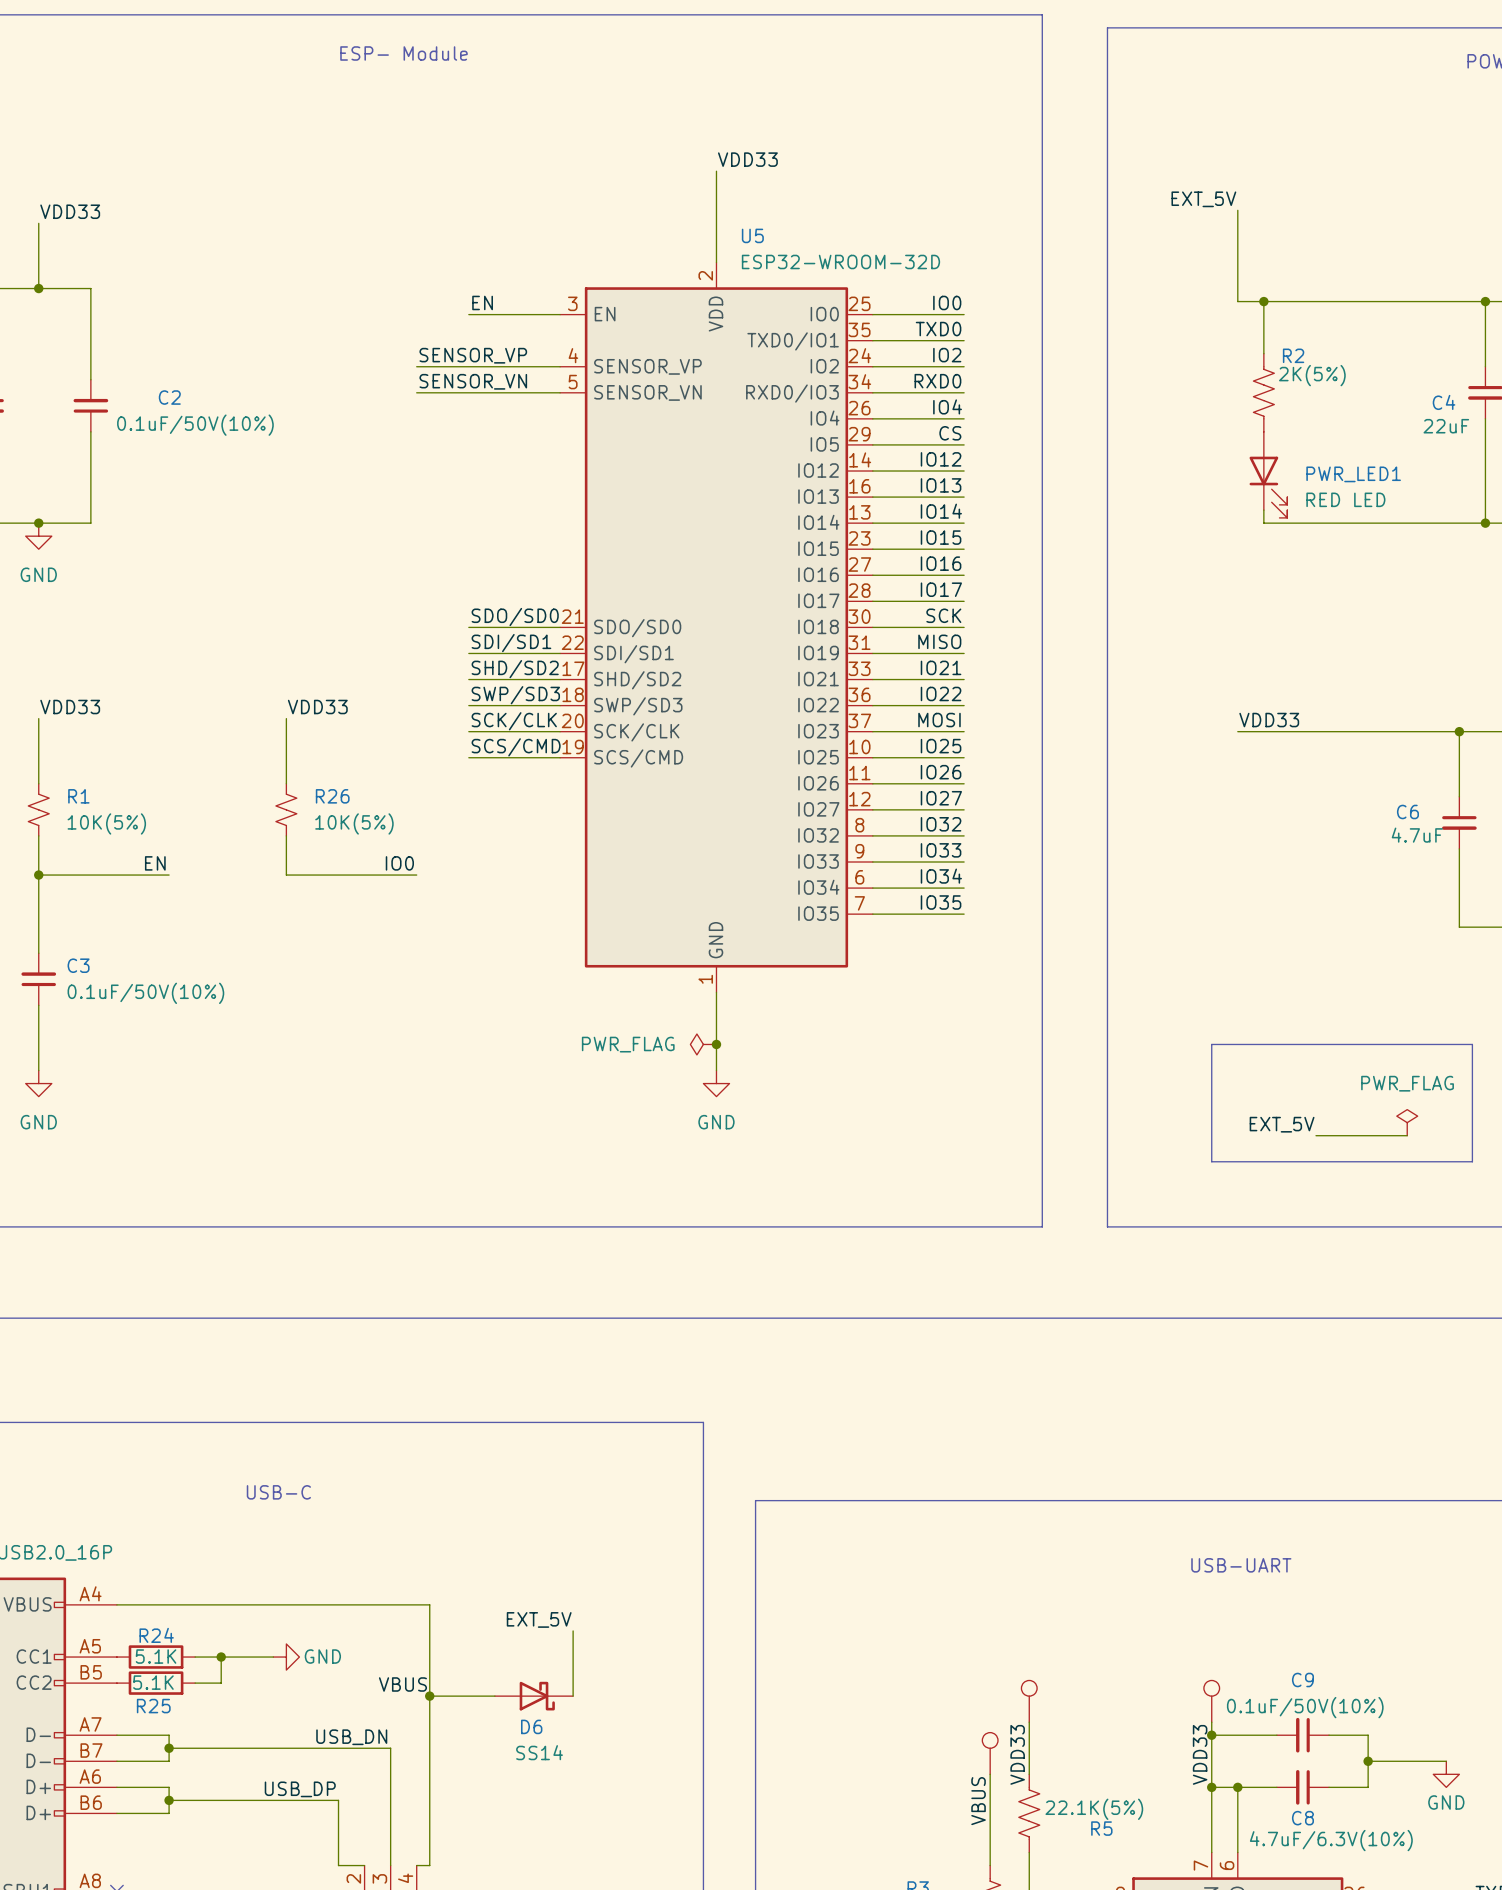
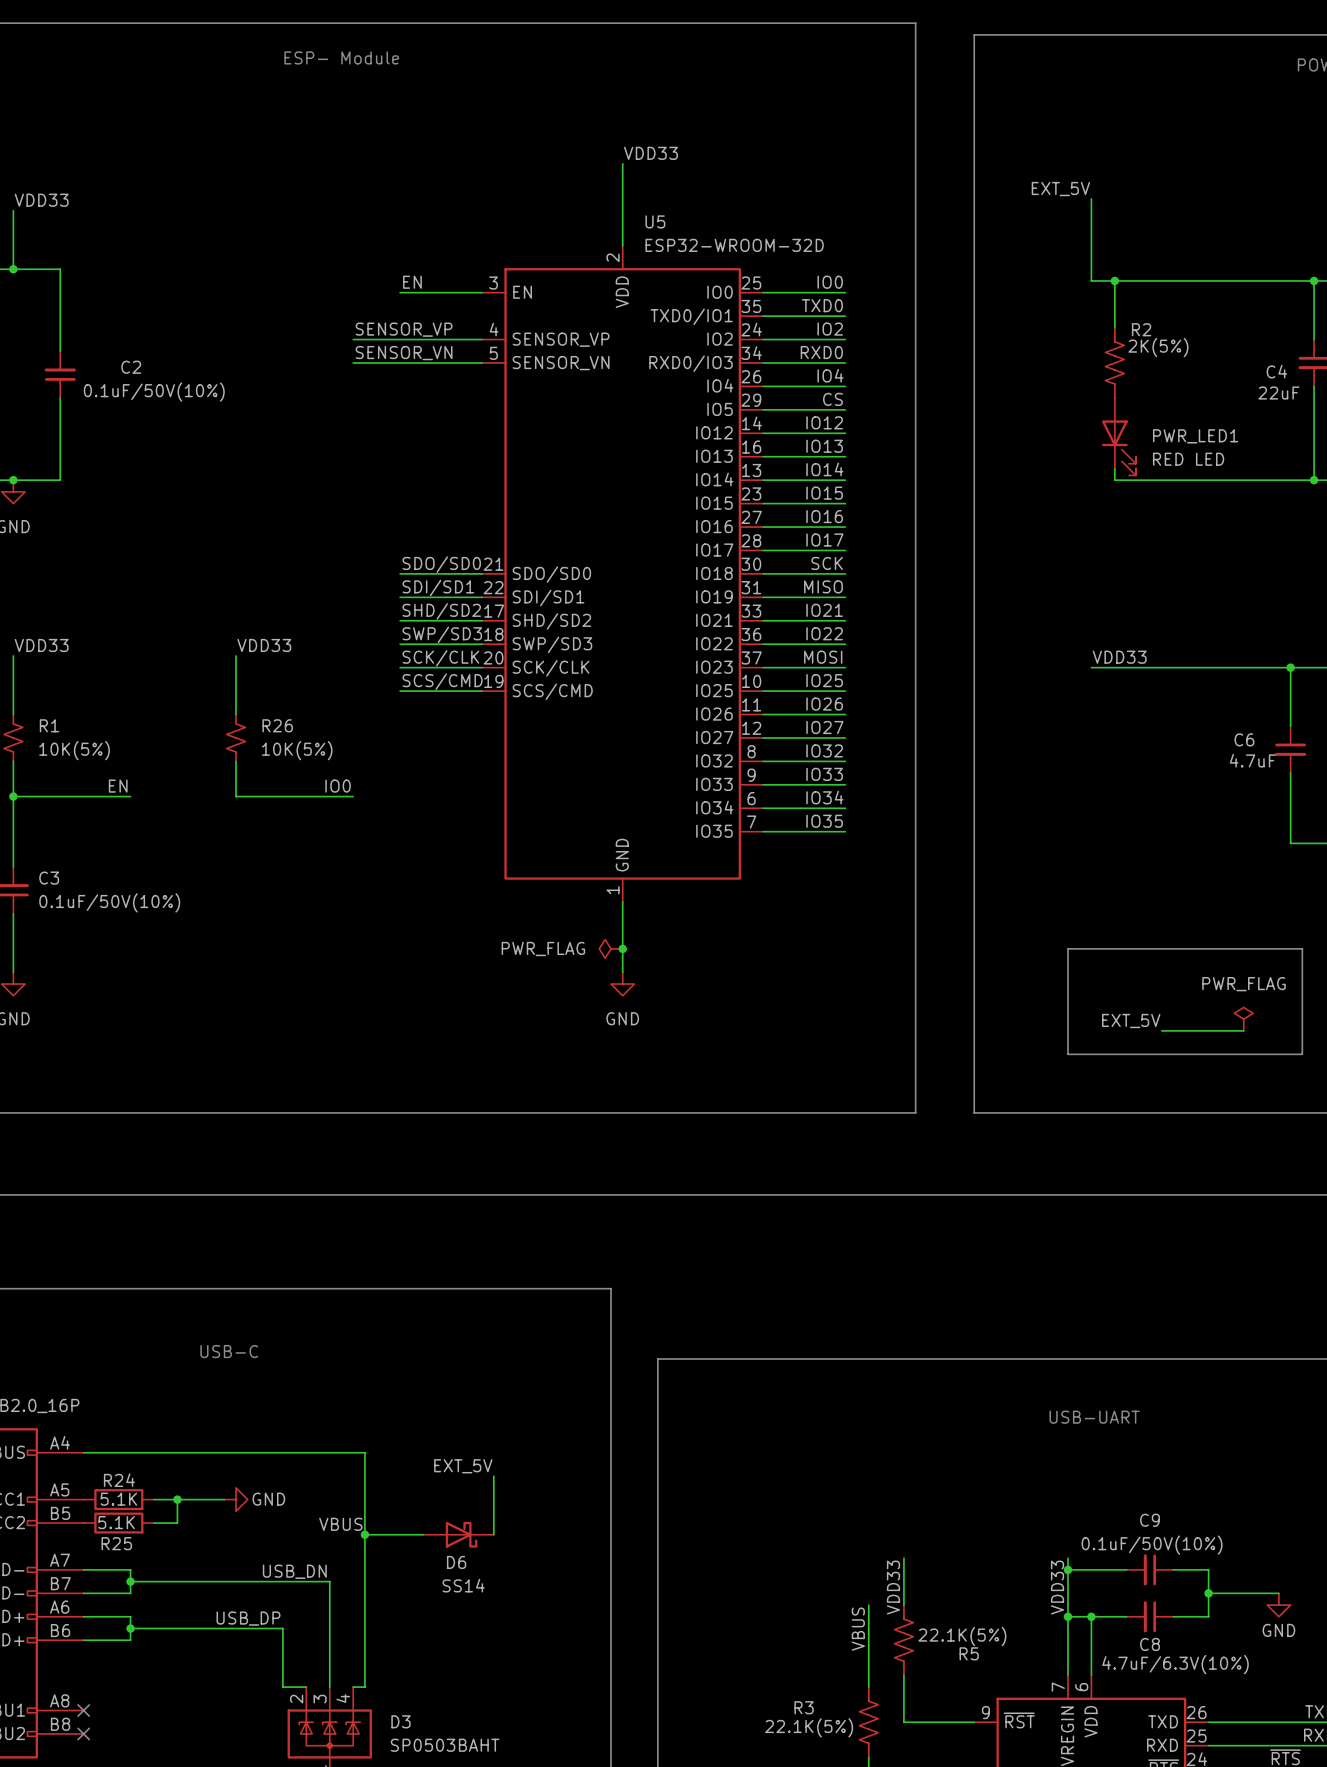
part: (1029, 1701) -> none
part: (1211, 1701) -> none
part: (990, 1753) -> none

